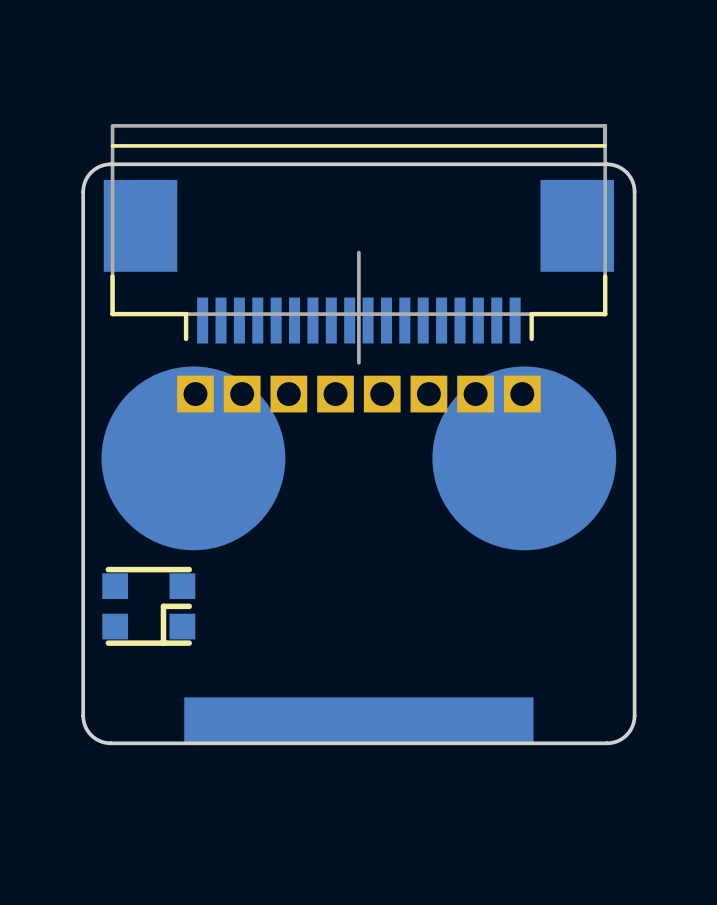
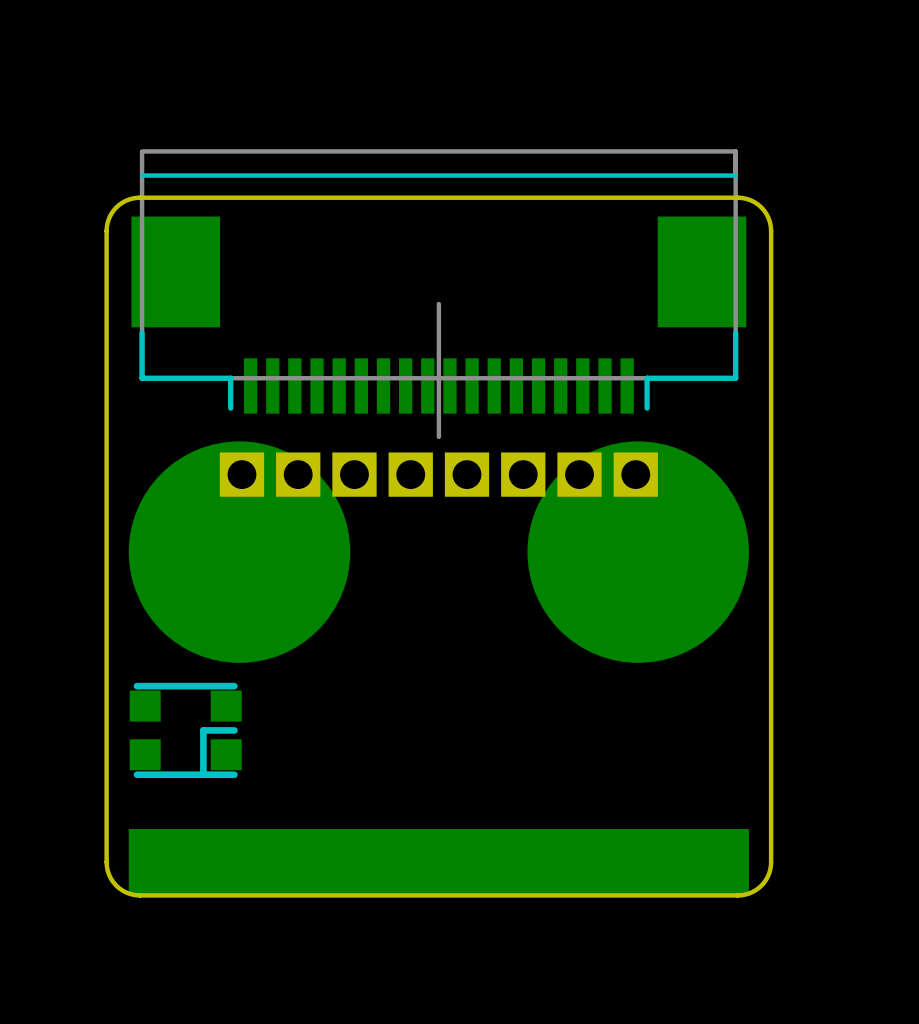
drawing shape: [184, 697, 534, 744] -> [128, 828, 749, 896]

